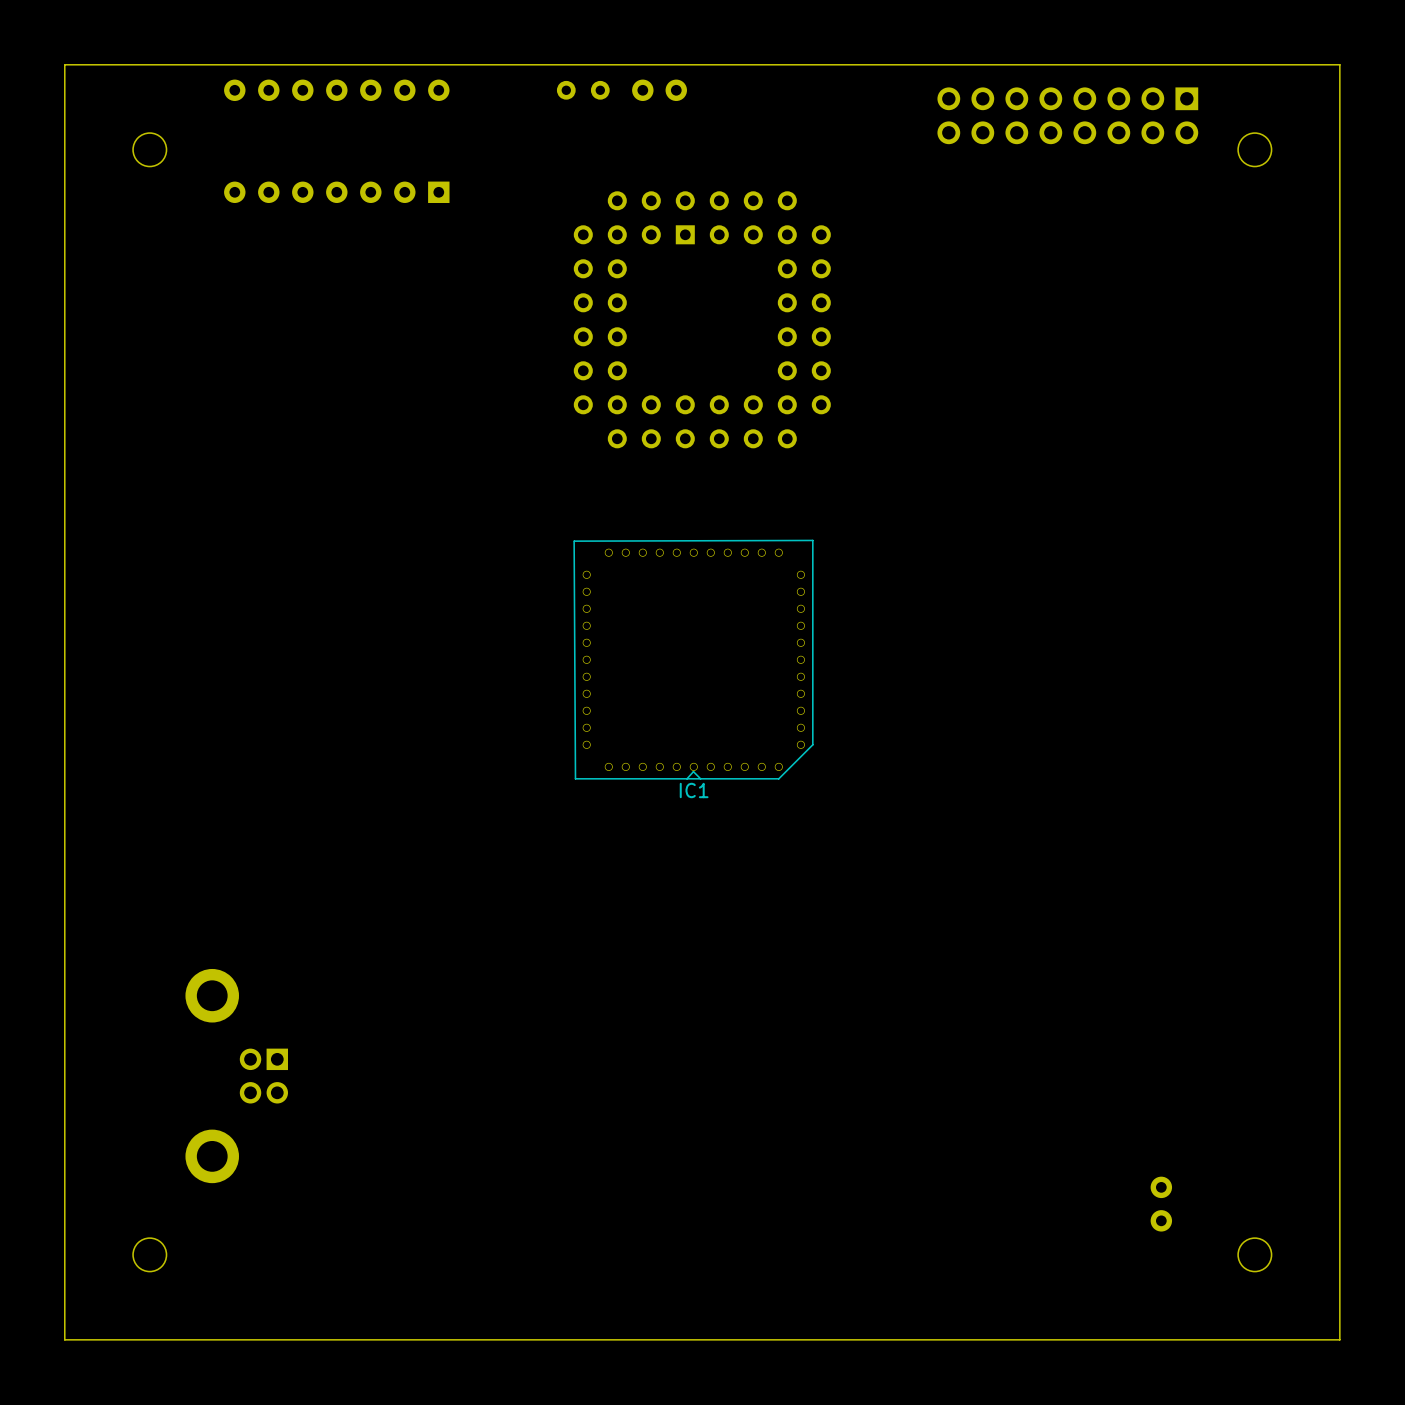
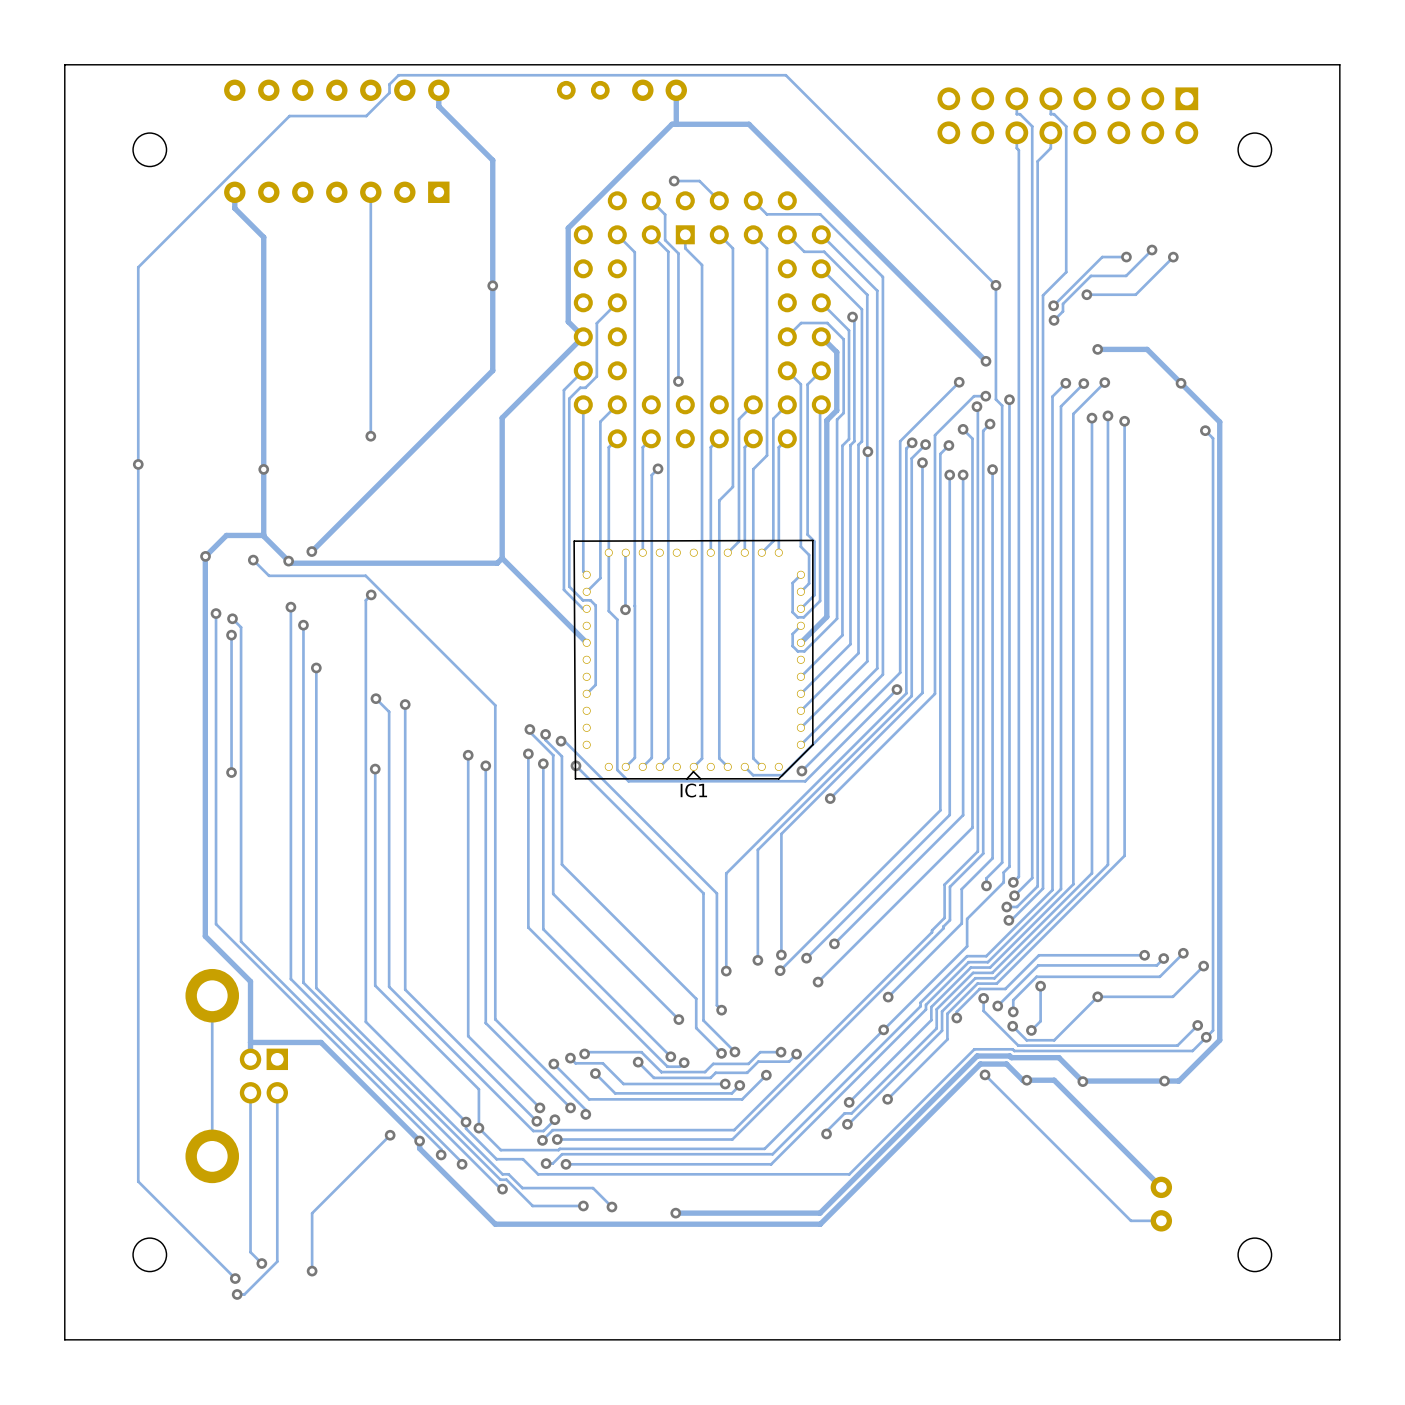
track: none -> (438, 90) (438, 106) (492, 160) (492, 370) (311, 551)
track: none -> (676, 90) (676, 124)
track: none -> (1016, 98) (1016, 114) (1020, 114) (1032, 126) (1032, 878) (1014, 895)
track: none -> (1050, 98) (1050, 114) (1054, 114) (1066, 126) (1066, 272) (1043, 295) (1043, 888) (1011, 920) (1008, 920)
track: none -> (1016, 132) (1016, 148) (1018, 150) (1018, 876) (1013, 882)
track: none -> (1050, 132) (1050, 148) (1037, 161) (1037, 886) (1017, 906) (1006, 906)
track: none -> (674, 181) (699, 181) (719, 200)
via: none -> (674, 181)
track: none -> (234, 192) (234, 208) (263, 237) (262, 535)
track: none -> (370, 192) (370, 436)
track: none -> (651, 200) (665, 214) (665, 240) (678, 253) (678, 381)
track: none -> (753, 200) (766, 214) (820, 214) (882, 276) (882, 674) (782, 775) (753, 775) (744, 766)
track: none -> (617, 234) (634, 252) (634, 605)
track: none -> (651, 234) (668, 251) (668, 758) (659, 766)
track: none -> (685, 234) (685, 248) (702, 265) (702, 758) (693, 766)
track: none -> (719, 234) (732, 248) (732, 486) (719, 500) (719, 758) (727, 766)
track: none -> (753, 234) (767, 248) (767, 455) (753, 469) (753, 758) (761, 766)
track: none -> (787, 234) (804, 251) (824, 251) (867, 294) (867, 661) (800, 727)
track: none -> (821, 234) (877, 290) (877, 668) (800, 744)
track: none -> (1152, 250) (1126, 275) (1091, 275) (1062, 303) (1062, 311) (1054, 320)
via: none -> (1152, 250)
track: none -> (1126, 257) (1102, 257) (1053, 305)
via: none -> (1126, 257)
track: none -> (1173, 257) (1135, 294) (1086, 294)
via: none -> (1173, 257)
track: none -> (821, 268) (861, 309) (861, 441) (858, 444) (858, 653) (800, 710)
via: none -> (492, 285)
via: none -> (995, 285)
via: none -> (1086, 294)
track: none -> (617, 302) (596, 323) (596, 376) (585, 387) (580, 387) (569, 398) (569, 586) (582, 600) (590, 600) (595, 605) (595, 684) (586, 693)
track: none -> (821, 302) (849, 330) (849, 439) (842, 445) (842, 635) (800, 676)
via: none -> (1053, 305)
track: none -> (852, 317) (854, 318) (854, 441) (850, 445) (850, 644) (800, 693)
via: none -> (852, 317)
via: none -> (1054, 320)
track: none -> (787, 336) (801, 323) (827, 323) (843, 339) (843, 413) (837, 419) (837, 618) (804, 651) (797, 651) (792, 646) (792, 634) (800, 625)
track: none -> (821, 336) (836, 352) (836, 410) (826, 420) (826, 616) (800, 642)
track: none -> (1097, 349) (1147, 349) (1219, 421) (1219, 1040) (1178, 1081) (1082, 1081) (1058, 1057) (977, 1056) (820, 1213) (675, 1213)
via: none -> (1097, 349)
track: none -> (986, 361) (748, 124) (672, 124) (568, 228) (568, 321) (583, 336) (502, 417) (502, 558)
via: none -> (986, 361)
track: none -> (583, 370) (563, 390) (563, 589) (582, 608) (586, 608)
track: none -> (787, 370) (800, 384) (800, 546) (809, 554) (809, 583) (800, 591)
track: none -> (821, 370) (807, 384) (807, 534) (814, 541) (814, 595) (800, 608)
via: none -> (678, 381)
track: none -> (959, 382) (900, 441) (900, 672) (801, 771)
via: none -> (959, 382)
track: none -> (1104, 382) (1073, 414) (1073, 884) (990, 967) (970, 967) (931, 1007) (931, 1020) (849, 1102)
via: none -> (1104, 382)
track: none -> (1065, 383) (1052, 396) (1052, 889) (986, 956) (967, 956) (920, 1002) (920, 1006) (772, 1154) (562, 1154) (552, 1163) (546, 1163)
via: none -> (1065, 383)
track: none -> (1083, 383) (1060, 406) (1060, 889) (987, 962) (968, 962) (925, 1004) (925, 1009) (771, 1164) (566, 1164)
via: none -> (1083, 383)
via: none -> (1181, 383)
track: none -> (985, 396) (974, 396) (934, 435) (934, 693) (830, 798)
via: none -> (985, 396)
track: none -> (1009, 399) (1009, 866) (1003, 872) (1003, 882) (967, 918) (967, 946) (764, 1148) (500, 1150) (478, 1128) (478, 1089) (375, 985) (375, 769)
via: none -> (1009, 399)
track: none -> (583, 404) (583, 571) (586, 574)
track: none -> (617, 404) (600, 421) (600, 578) (586, 591)
track: none -> (753, 404) (738, 419) (738, 541) (727, 552)
track: none -> (787, 404) (773, 418) (773, 541) (761, 552)
track: none -> (821, 404) (820, 601) (803, 617) (797, 617) (792, 612) (792, 583) (800, 574)
track: none -> (976, 406) (977, 851) (944, 884) (944, 917) (734, 1130) (552, 1130) (542, 1140)
via: none -> (976, 406)
track: none -> (1107, 415) (1107, 864) (994, 978) (975, 978) (942, 1011) (942, 1030) (847, 1124)
via: none -> (1107, 415)
track: none -> (1091, 418) (1091, 873) (992, 972) (973, 972) (936, 1009) (936, 1028) (851, 1113) (844, 1113) (826, 1131) (826, 1133)
via: none -> (1091, 418)
track: none -> (1124, 421) (1124, 855) (996, 983) (977, 983) (947, 1013) (947, 1039) (887, 1099)
via: none -> (1124, 421)
track: none -> (990, 424) (983, 430) (983, 853) (949, 886) (949, 920) (732, 1139) (557, 1139)
via: none -> (990, 424)
track: none -> (963, 429) (972, 438) (972, 827) (818, 982)
via: none -> (963, 429)
track: none -> (1205, 430) (1213, 438) (1213, 1030) (1192, 1050) (974, 1049) (849, 1174) (538, 1174) (523, 1159) (496, 1159) (466, 1128) (466, 1122) (365, 1021) (365, 600) (371, 594)
via: none -> (1205, 430)
via: none -> (370, 436)
track: none -> (617, 438) (608, 447) (608, 611) (617, 619) (617, 769) (628, 781) (805, 781) (896, 689)
track: none -> (651, 438) (642, 447) (642, 552)
track: none -> (719, 438) (710, 447) (710, 552)
track: none -> (753, 438) (744, 447) (744, 552)
track: none -> (787, 438) (778, 447) (778, 552)
track: none -> (912, 442) (906, 448) (906, 693) (726, 873) (726, 971)
via: none -> (912, 442)
track: none -> (925, 444) (911, 458) (911, 696) (757, 849) (757, 960)
via: none -> (925, 444)
track: none -> (948, 445) (940, 454) (940, 810) (780, 970)
via: none -> (948, 445)
via: none -> (867, 451)
track: none -> (922, 462) (922, 692) (781, 833) (781, 955)
via: none -> (922, 462)
via: none -> (138, 464)
track: none -> (658, 468) (651, 475) (651, 757) (642, 766)
via: none -> (658, 468)
via: none -> (263, 469)
track: none -> (992, 469) (992, 858) (961, 889) (961, 923) (888, 997)
via: none -> (992, 469)
track: none -> (949, 474) (949, 814) (806, 958)
via: none -> (949, 474)
track: none -> (963, 474) (963, 815) (834, 943)
via: none -> (963, 474)
track: none -> (262, 535) (226, 535) (205, 556) (205, 936) (250, 981) (250, 1059)
track: none -> (262, 535) (290, 563) (497, 563) (502, 558)
via: none -> (311, 551)
track: none -> (625, 552) (625, 609)
via: none -> (205, 556)
track: none -> (502, 558) (586, 642)
track: none -> (253, 560) (269, 575) (365, 575) (495, 705) (495, 1019) (585, 1109) (585, 1114)
via: none -> (253, 560)
via: none -> (288, 561)
via: none -> (371, 594)
track: none -> (634, 605) (634, 757) (625, 766)
track: none -> (290, 607) (290, 979) (502, 1189)
via: none -> (290, 607)
via: none -> (625, 609)
track: none -> (216, 613) (216, 924) (441, 1149) (441, 1154)
via: none -> (216, 613)
track: none -> (232, 618) (241, 627) (241, 941) (462, 1164)
via: none -> (232, 618)
track: none -> (303, 625) (303, 982) (500, 1179) (506, 1179) (532, 1205) (583, 1205)
via: none -> (303, 625)
track: none -> (231, 635) (231, 772)
via: none -> (231, 635)
track: none -> (316, 667) (316, 988) (502, 1174) (508, 1174) (522, 1188) (593, 1188) (611, 1207)
via: none -> (316, 667)
via: none -> (896, 689)
track: none -> (375, 698) (389, 711) (389, 986) (533, 1131) (543, 1131) (554, 1119)
via: none -> (375, 698)
track: none -> (405, 704) (405, 989) (536, 1121)
via: none -> (405, 704)
track: none -> (529, 729) (529, 731) (553, 755) (553, 893) (678, 1019)
via: none -> (529, 729)
track: none -> (545, 734) (545, 740) (561, 756) (561, 864) (696, 998) (696, 1028) (721, 1053)
via: none -> (545, 734)
track: none -> (561, 741) (564, 741) (716, 893) (716, 1005) (721, 1010)
via: none -> (561, 741)
track: none -> (528, 753) (528, 927) (667, 1066) (680, 1066) (684, 1062)
via: none -> (528, 753)
track: none -> (468, 755) (468, 1036) (539, 1107)
via: none -> (468, 755)
track: none -> (543, 763) (543, 929) (670, 1056)
via: none -> (543, 763)
track: none -> (485, 765) (485, 1023) (570, 1107)
via: none -> (485, 765)
track: none -> (575, 765) (703, 893) (703, 1020) (734, 1051)
via: none -> (575, 765)
via: none -> (375, 769)
via: none -> (801, 771)
via: none -> (231, 772)
via: none -> (830, 798)
via: none -> (1013, 882)
track: none -> (986, 885) (986, 878) (1002, 862) (1002, 405) (995, 399) (995, 285) (785, 75) (398, 75) (389, 84) (389, 92) (366, 116) (289, 116) (138, 267) (138, 1181) (235, 1278)
via: none -> (986, 885)
via: none -> (1014, 895)
via: none -> (1006, 906)
via: none -> (1008, 920)
via: none -> (834, 943)
track: none -> (1183, 953) (1159, 976) (1036, 976) (1013, 1000) (1013, 1011)
via: none -> (1183, 953)
via: none -> (781, 955)
track: none -> (1144, 955) (1038, 955) (1005, 988) (979, 988) (956, 1011) (956, 1018)
via: none -> (1144, 955)
via: none -> (806, 958)
track: none -> (1163, 958) (1156, 965) (1038, 965) (997, 1005)
via: none -> (1163, 958)
via: none -> (757, 960)
track: none -> (1203, 966) (1172, 996) (1097, 996) (1054, 1040) (1026, 1040) (1012, 1026)
via: none -> (1203, 966)
via: none -> (780, 970)
via: none -> (726, 971)
via: none -> (818, 982)
track: none -> (1040, 986) (1040, 1021) (1031, 1030)
via: none -> (1040, 986)
track: none -> (212, 995) (212, 1156)
via: none -> (1097, 996)
via: none -> (888, 997)
track: none -> (983, 998) (983, 1010) (1018, 1045) (1177, 1045) (1197, 1025)
via: none -> (983, 998)
via: none -> (997, 1005)
via: none -> (721, 1010)
via: none -> (1013, 1011)
via: none -> (956, 1018)
via: none -> (678, 1019)
via: none -> (1197, 1025)
via: none -> (1012, 1026)
via: none -> (883, 1029)
via: none -> (1031, 1030)
via: none -> (1206, 1037)
track: none -> (250, 1042) (321, 1042) (419, 1140) (419, 1148) (495, 1224) (820, 1224) (980, 1064) (1006, 1064) (1022, 1080) (1054, 1080) (1161, 1187)
via: none -> (734, 1051)
track: none -> (781, 1052) (760, 1052) (748, 1063) (713, 1063) (705, 1072) (661, 1072) (641, 1052) (586, 1052) (584, 1053)
via: none -> (781, 1052)
via: none -> (584, 1053)
via: none -> (721, 1053)
track: none -> (796, 1054) (789, 1061) (758, 1061) (747, 1072) (715, 1072) (710, 1077) (653, 1077) (638, 1062)
via: none -> (796, 1054)
via: none -> (670, 1056)
track: none -> (570, 1058) (575, 1063) (602, 1063) (623, 1084) (725, 1084)
via: none -> (570, 1058)
via: none -> (638, 1062)
via: none -> (684, 1062)
track: none -> (553, 1064) (589, 1099) (742, 1099) (766, 1075)
via: none -> (553, 1064)
track: none -> (595, 1073) (615, 1093) (731, 1093) (739, 1085)
via: none -> (595, 1073)
track: none -> (985, 1074) (1130, 1220) (1161, 1220)
via: none -> (985, 1074)
via: none -> (766, 1075)
via: none -> (1026, 1080)
via: none -> (1082, 1081)
via: none -> (1164, 1081)
via: none -> (725, 1084)
via: none -> (739, 1085)
track: none -> (250, 1092) (250, 1252) (261, 1263)
track: none -> (277, 1092) (277, 1261) (244, 1294) (237, 1294)
via: none -> (887, 1099)
via: none -> (849, 1102)
via: none -> (539, 1107)
via: none -> (570, 1107)
via: none -> (585, 1114)
via: none -> (554, 1119)
via: none -> (536, 1121)
via: none -> (466, 1122)
via: none -> (847, 1124)
via: none -> (478, 1128)
via: none -> (826, 1133)
track: none -> (390, 1135) (312, 1213) (312, 1271)
via: none -> (390, 1135)
via: none -> (557, 1139)
via: none -> (419, 1140)
via: none -> (542, 1140)
via: none -> (441, 1154)
via: none -> (546, 1163)
via: none -> (462, 1164)
via: none -> (566, 1164)
via: none -> (502, 1189)
via: none -> (583, 1205)
via: none -> (611, 1207)
via: none -> (675, 1213)
via: none -> (261, 1263)
via: none -> (312, 1271)
via: none -> (235, 1278)
via: none -> (237, 1294)

